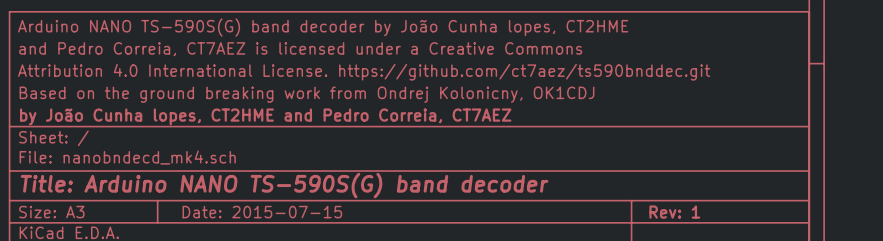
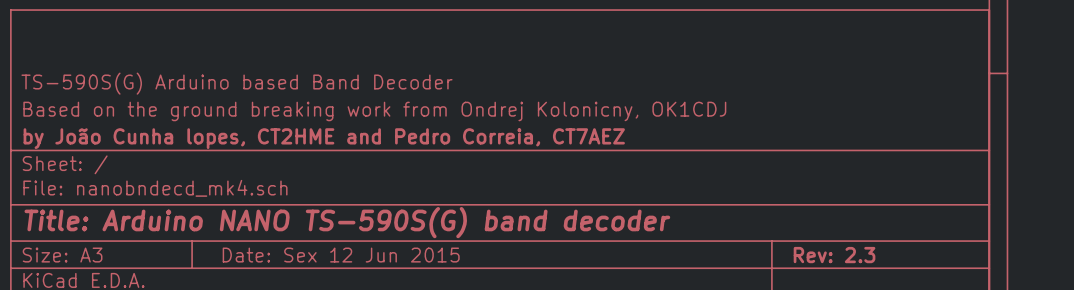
title block: Arduino NANO TS-590S(G) band decoder by João Cunha lopes, CT2HME (323, 27) -> none
title block: and Pedro Correia, CT7AEZ is licensed under a Creative Commons (300, 49) -> none
title block: Attribution 4.0 International License. https://github.com/ct7aez/ts590bnddec.git (364, 72) -> TS-590S(G) Arduino based Band Decoder (236, 83)
title block: Date: 2015-07-15 (262, 212) -> Date: Sex 12 Jun 2015 (341, 255)
title block: Rev: 1 (674, 212) -> Rev: 2.3 (834, 255)

